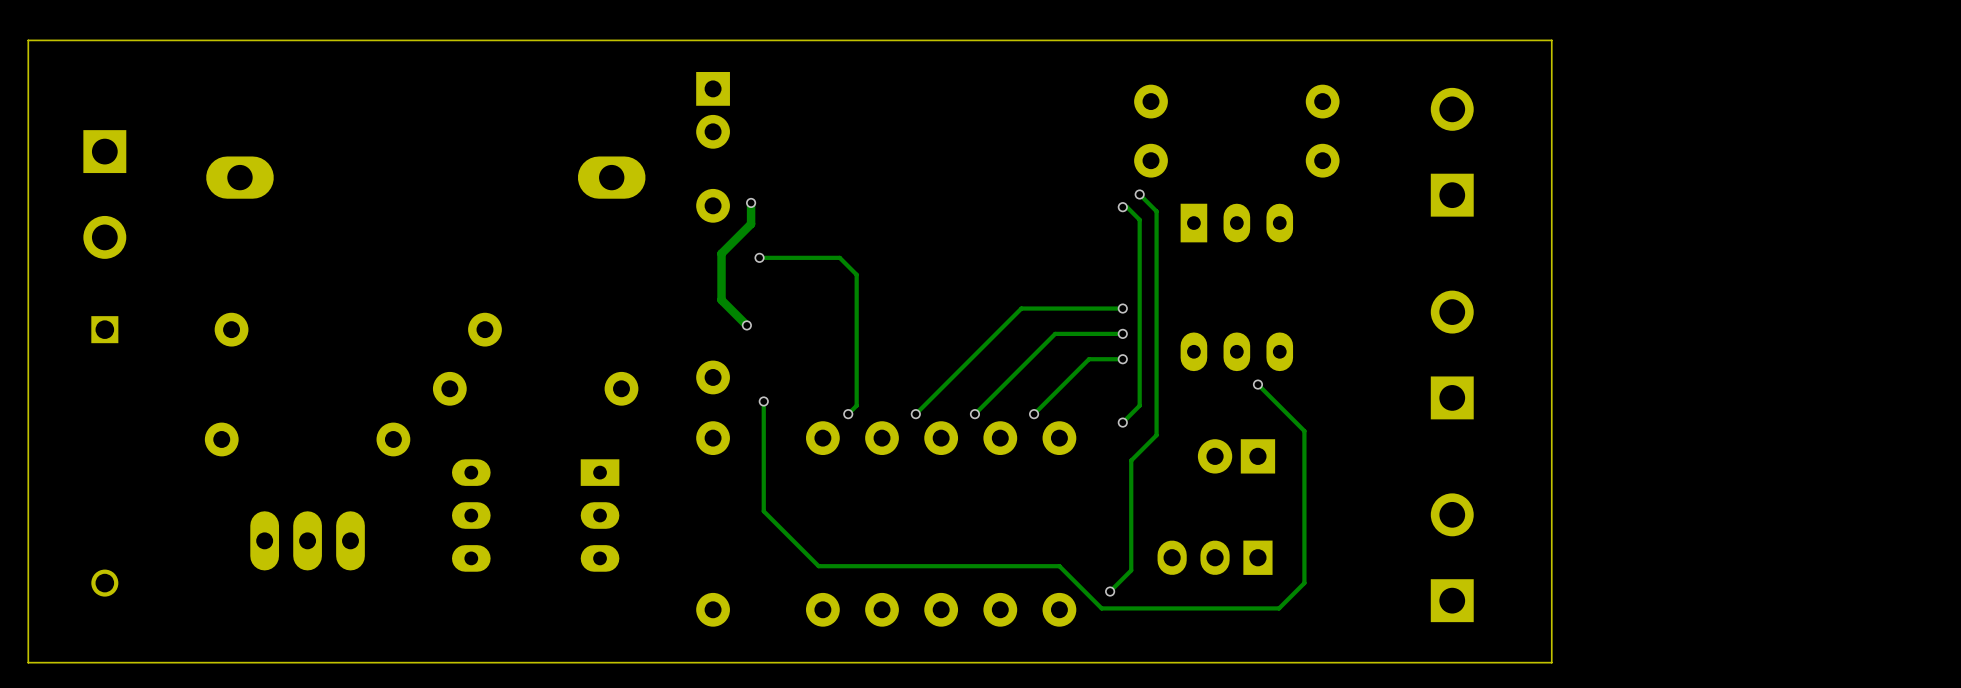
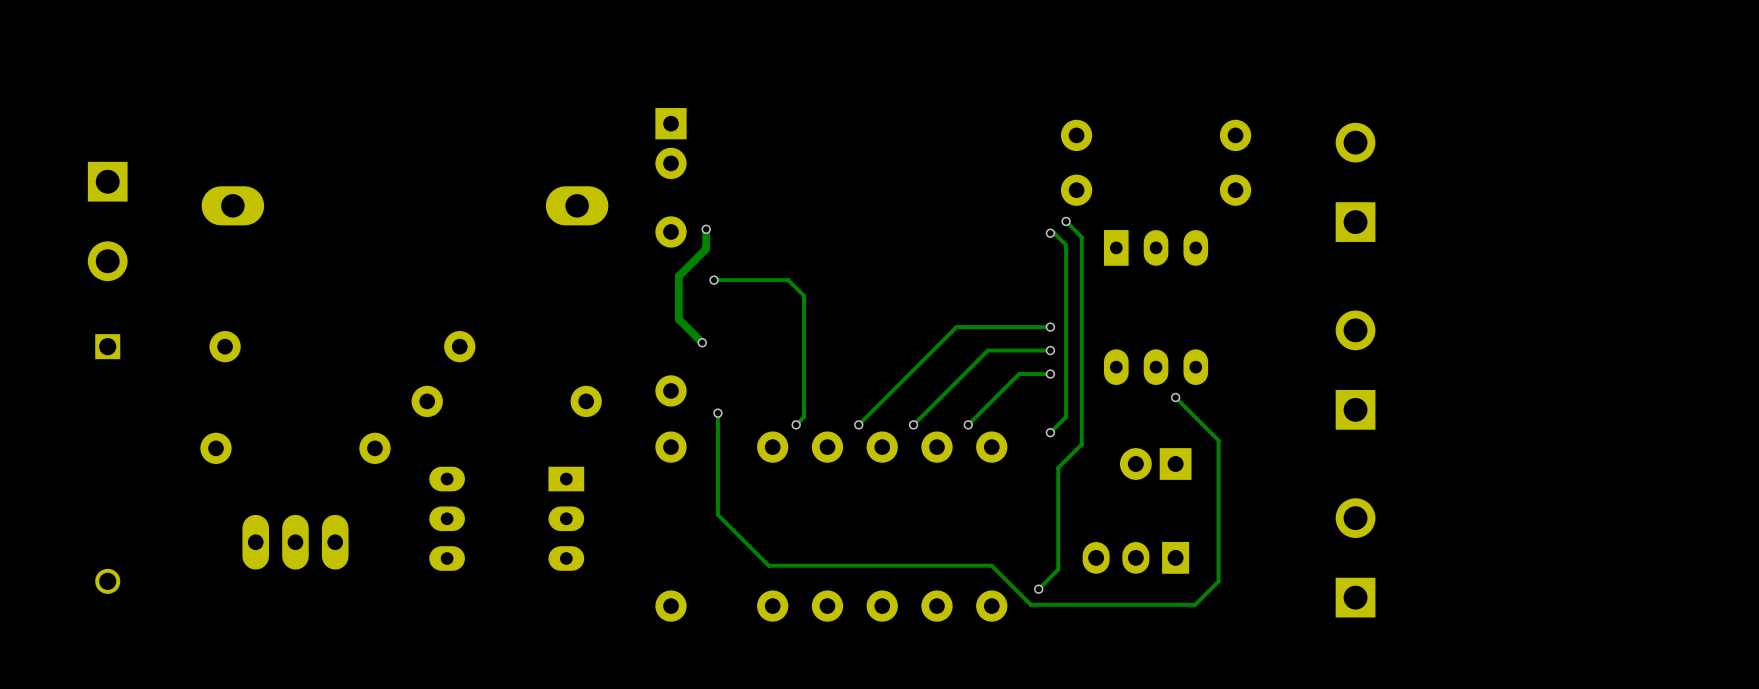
board edge: (1551, 40) (1551, 662) (28, 662) (28, 40) (1551, 40) -> none

